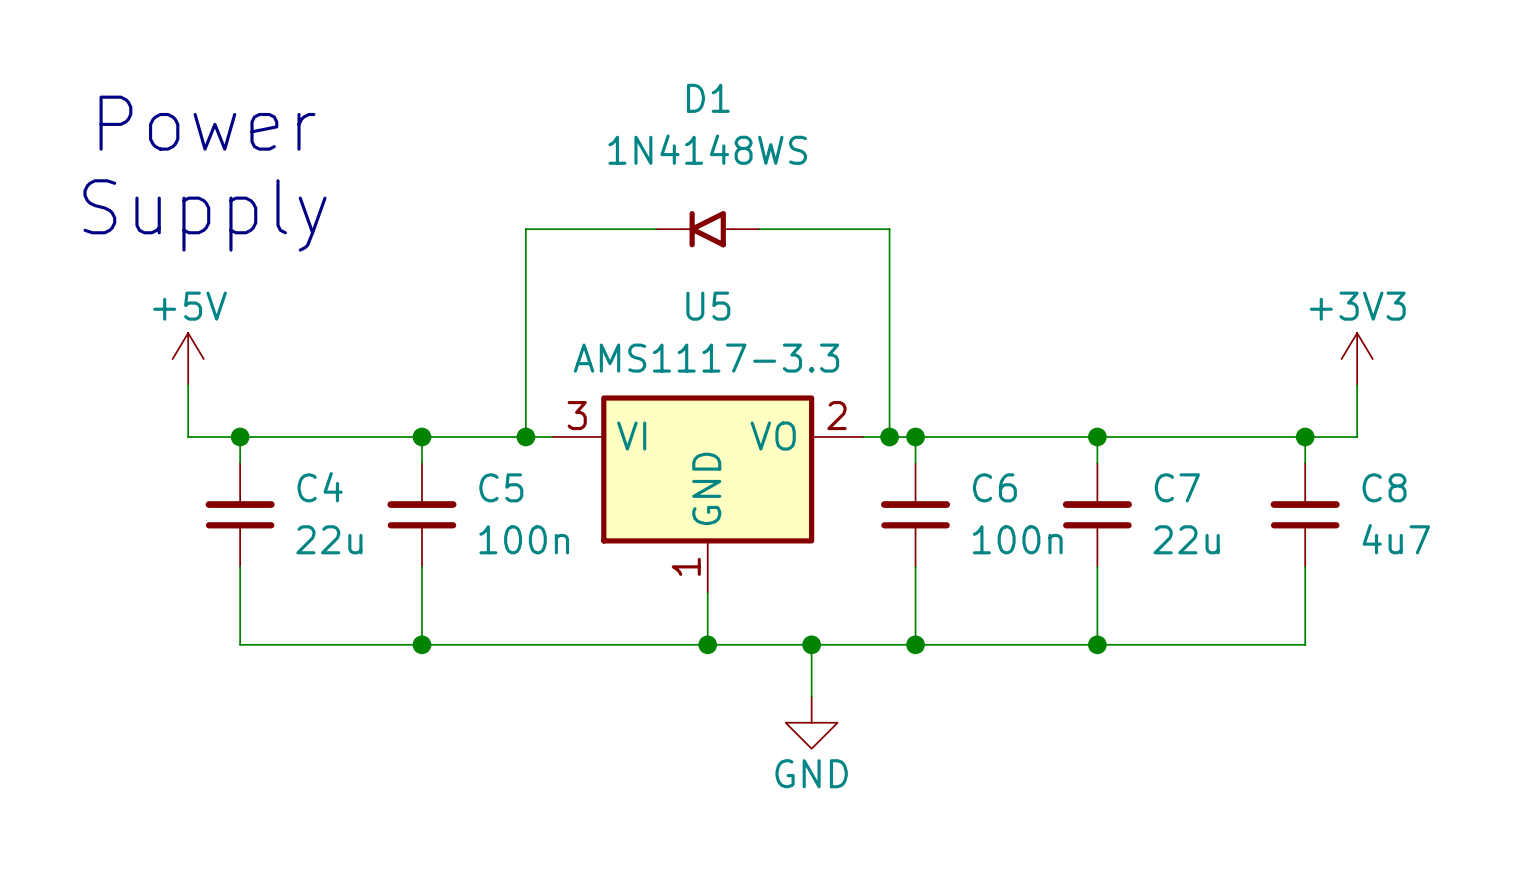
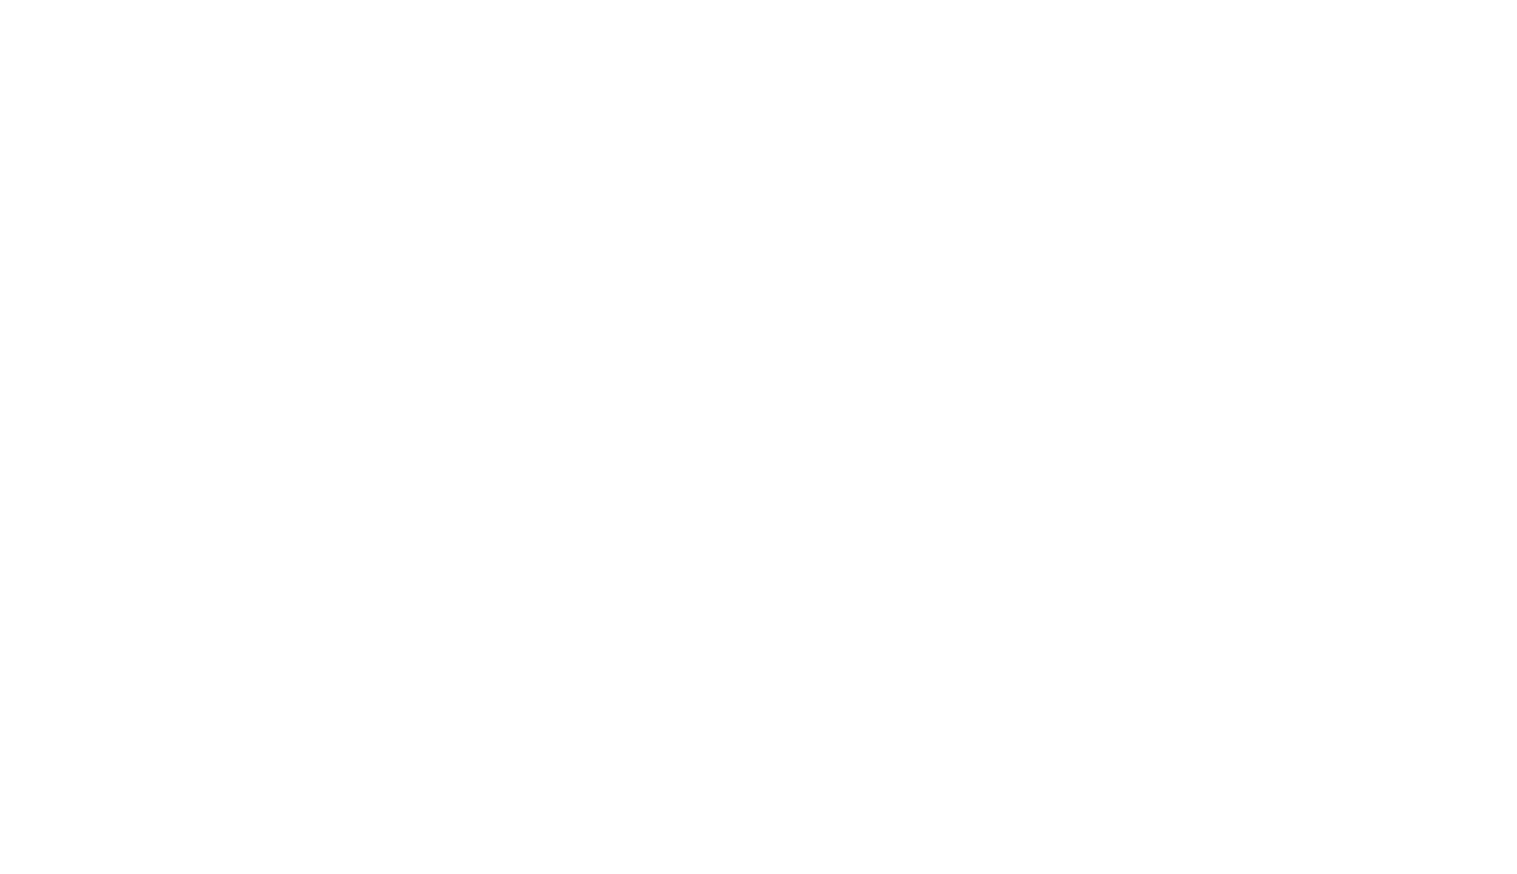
text: Power (207, 123) -> none
text: Supply (205, 215) -> none
wire: (655, 229) (525, 229) (525, 436) -> none
D1: 1N4148WS (707, 229) -> none
wire: (759, 229) (889, 229) (889, 436) -> none
power symbol: +5V (188, 359) -> none
power symbol: +3V3 (1357, 359) -> none
wire: (188, 385) (188, 436) (551, 436) -> none
wire: (1357, 385) (1357, 436) (863, 436) -> none
wire: (240, 436) (240, 462) -> none
junction: (240, 436) -> none
wire: (421, 436) (421, 462) -> none
junction: (421, 436) -> none
junction: (525, 436) -> none
junction: (889, 436) -> none
wire: (915, 436) (915, 462) -> none
junction: (915, 436) -> none
wire: (1097, 436) (1097, 462) -> none
junction: (1097, 436) -> none
wire: (1305, 436) (1305, 462) -> none
junction: (1305, 436) -> none
U5: AMS1117-3.3 (707, 494) -> none
C4: 22u (240, 514) -> none
C5: 100n (421, 514) -> none
C6: 100n (915, 514) -> none
C7: 22u (1097, 514) -> none
C8: 4u7 (1305, 514) -> none
wire: (240, 566) (240, 644) (1305, 644) (1305, 566) -> none
wire: (421, 566) (421, 644) -> none
wire: (915, 566) (915, 644) -> none
wire: (1097, 566) (1097, 644) -> none
wire: (707, 592) (707, 644) -> none
junction: (421, 644) -> none
junction: (707, 644) -> none
wire: (811, 644) (811, 696) -> none
junction: (811, 644) -> none
junction: (915, 644) -> none
junction: (1097, 644) -> none
power symbol: GND (811, 722) -> none

